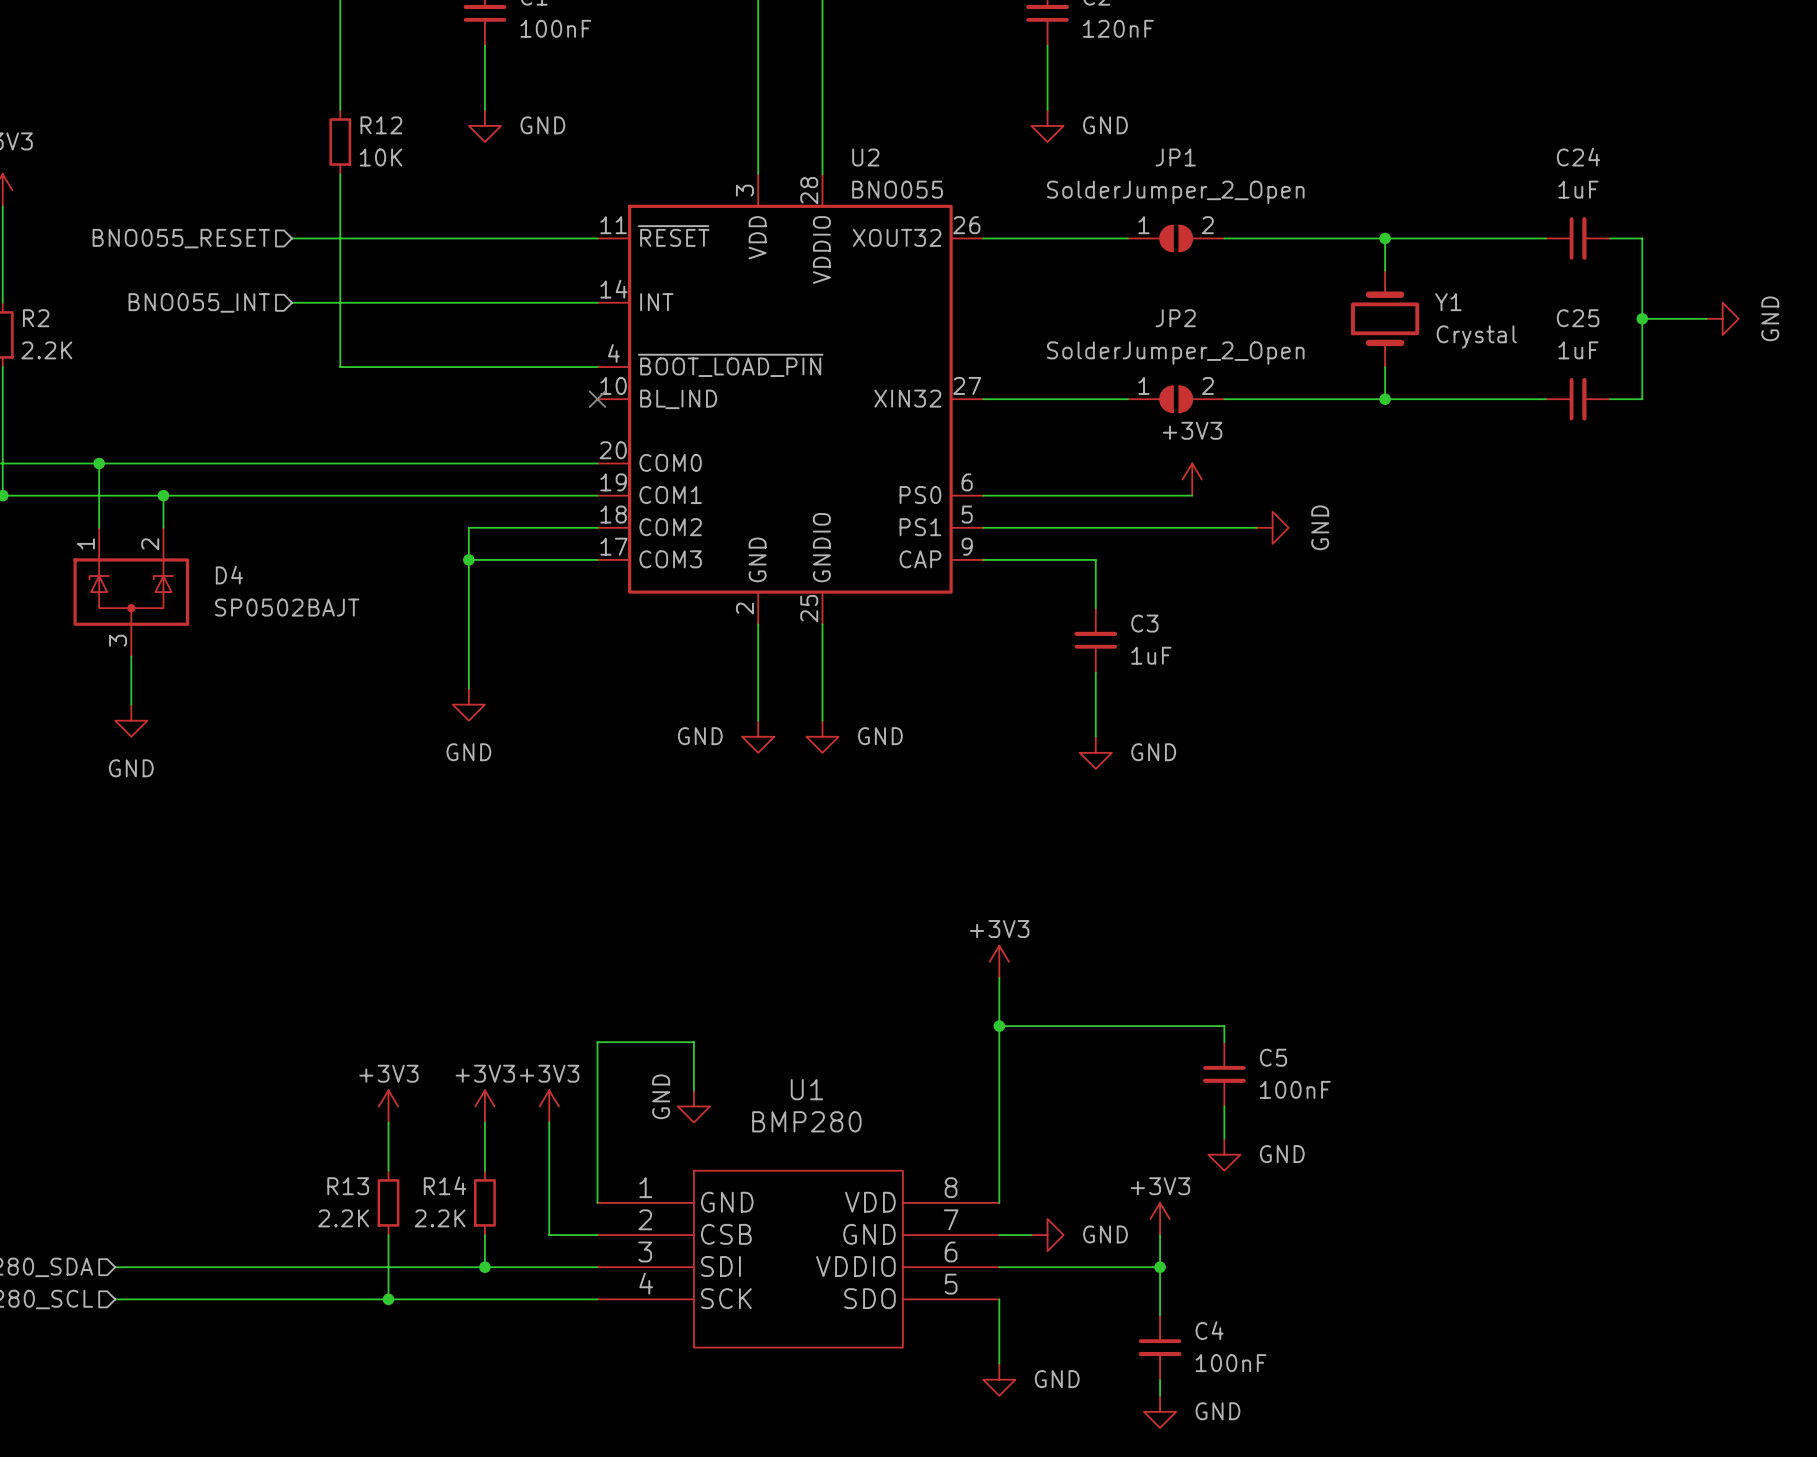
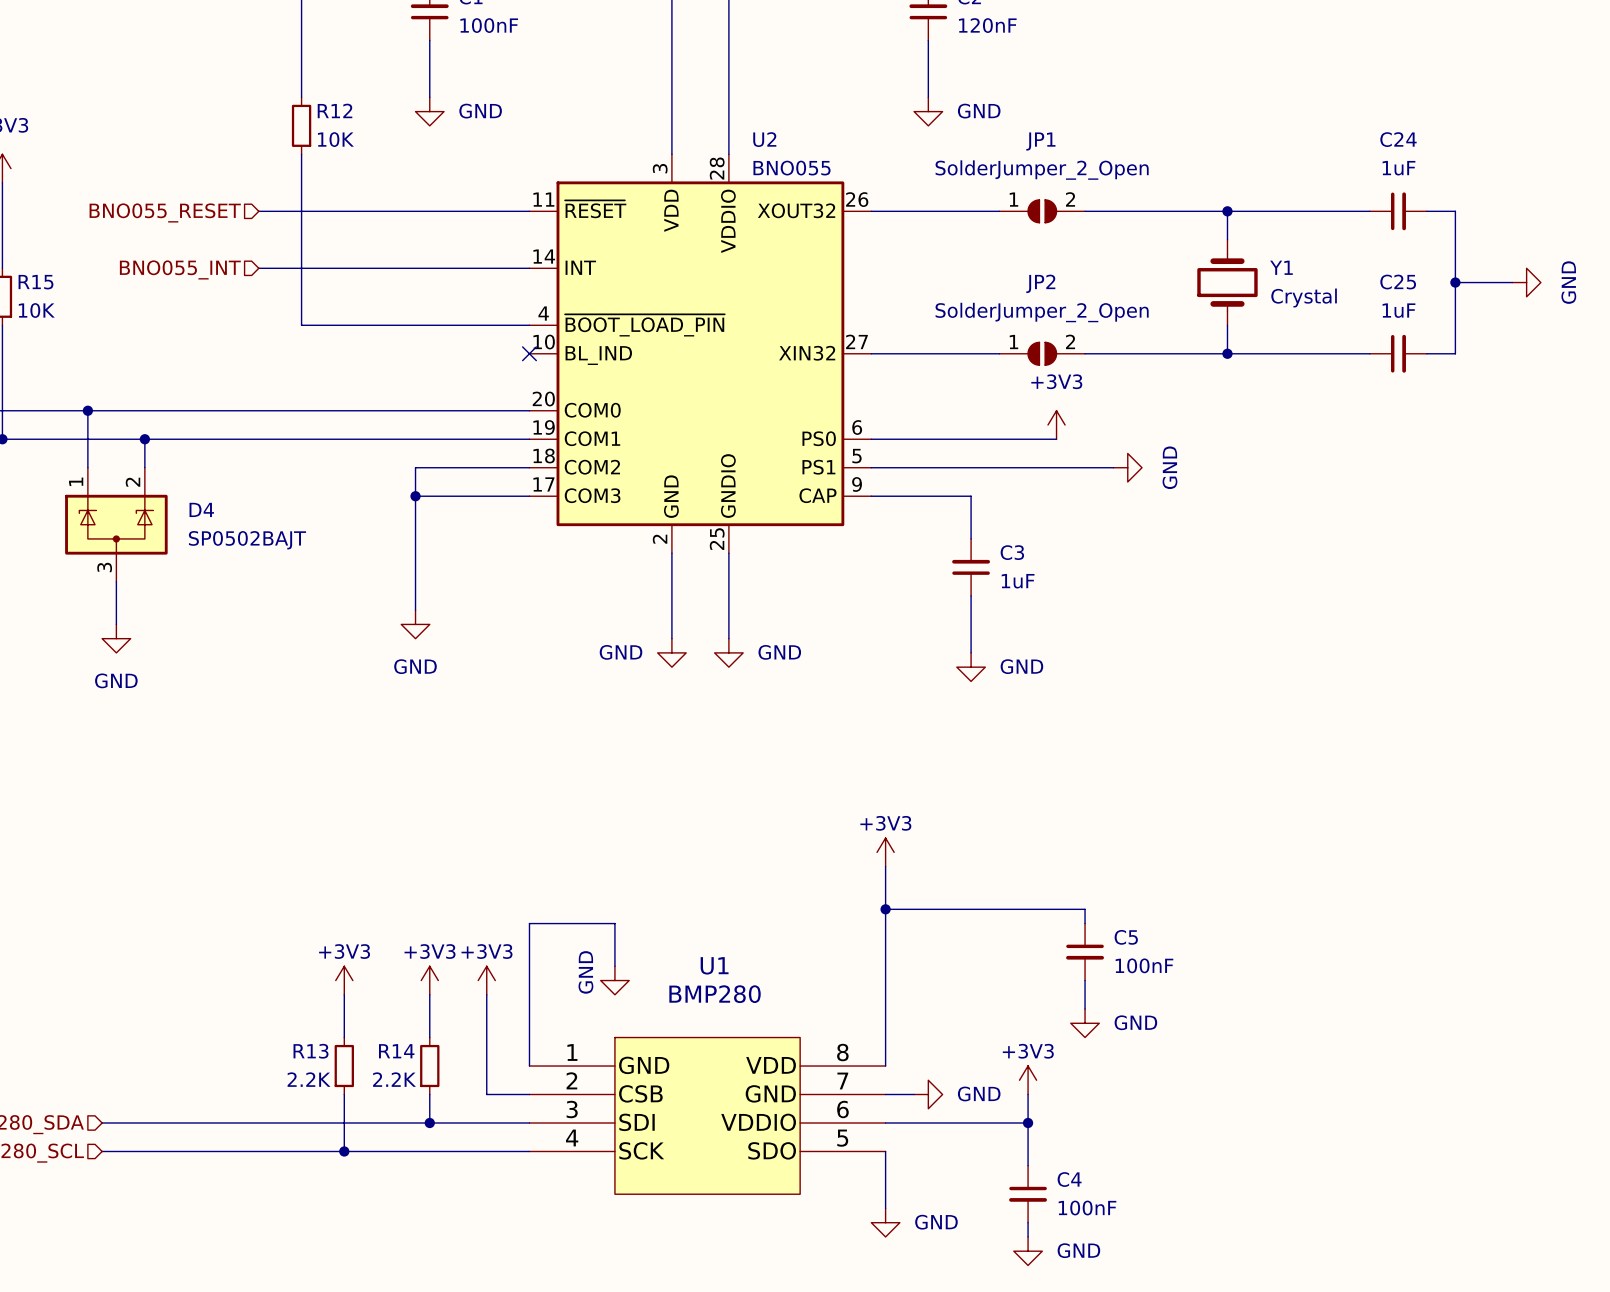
R2 name: R2 (36, 318) -> R15 (35, 282)
R2 value: 2.2K (46, 350) -> 10K (36, 310)

